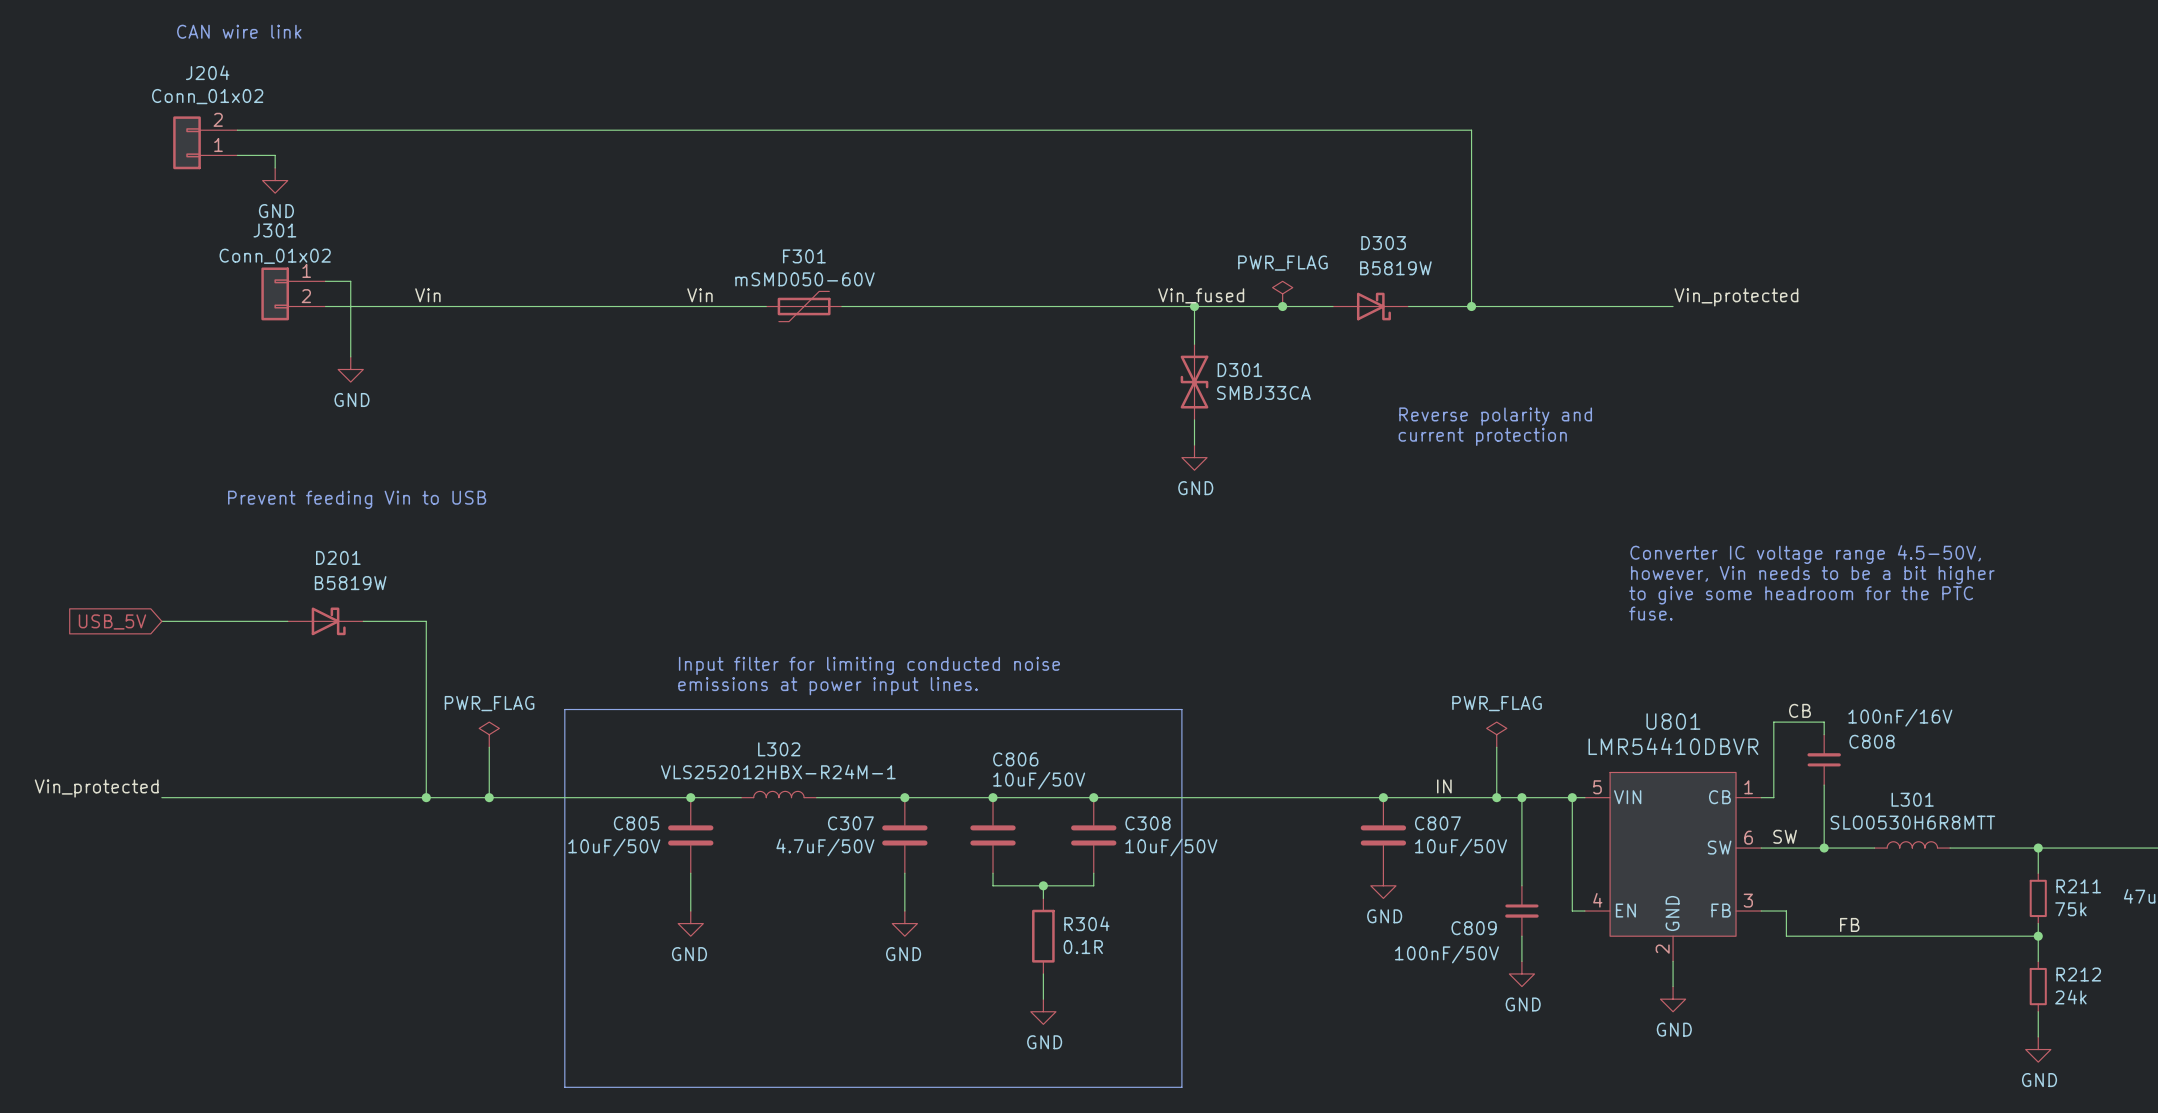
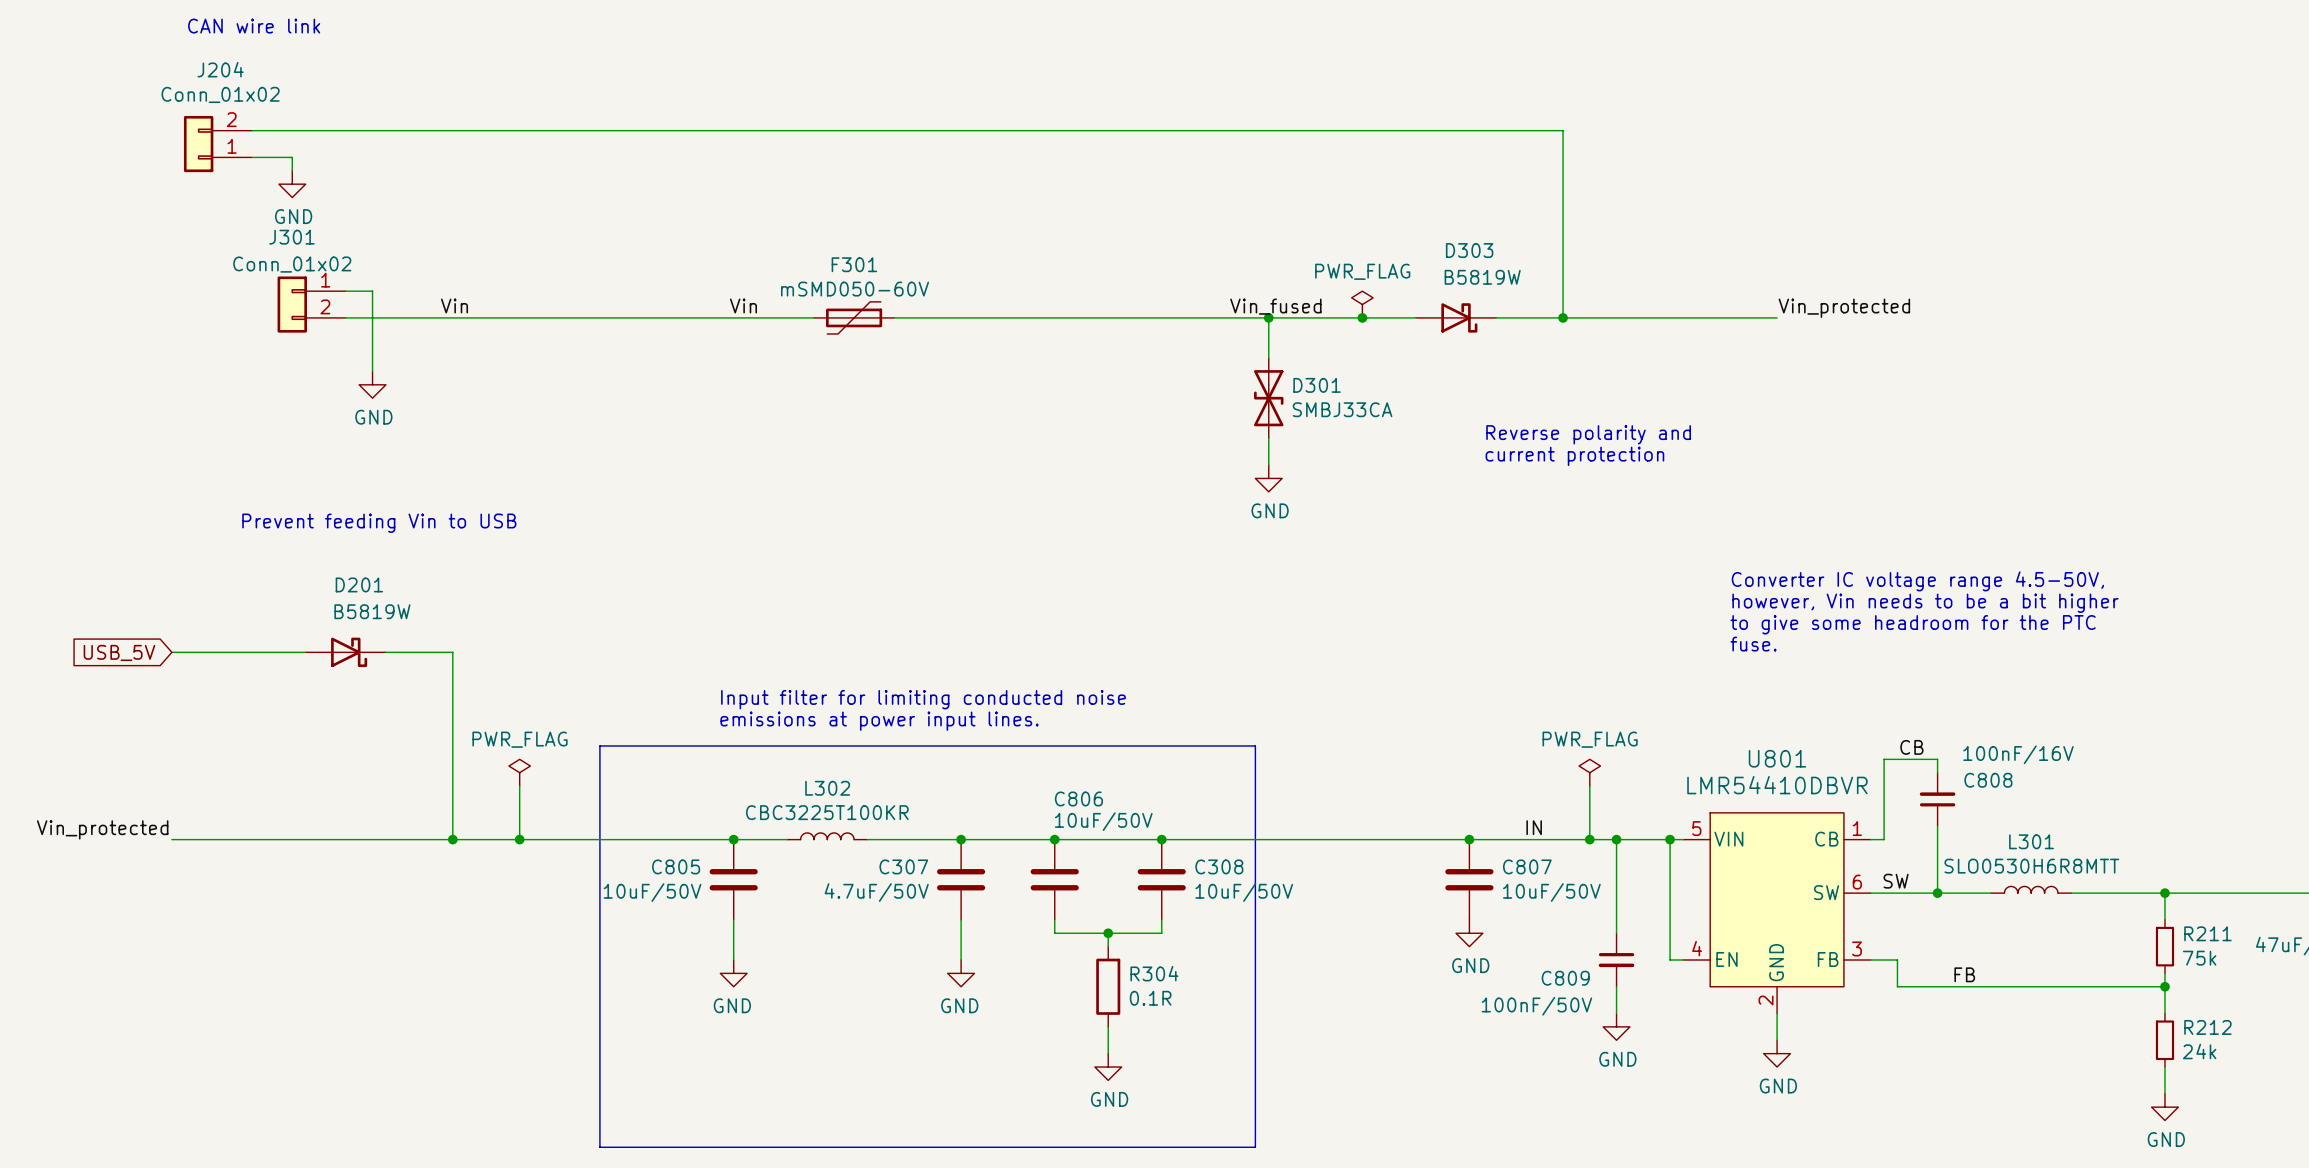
L302 value: VLS252012HBX-R24M-1 (778, 771) -> CBC3225T100KR (827, 812)

